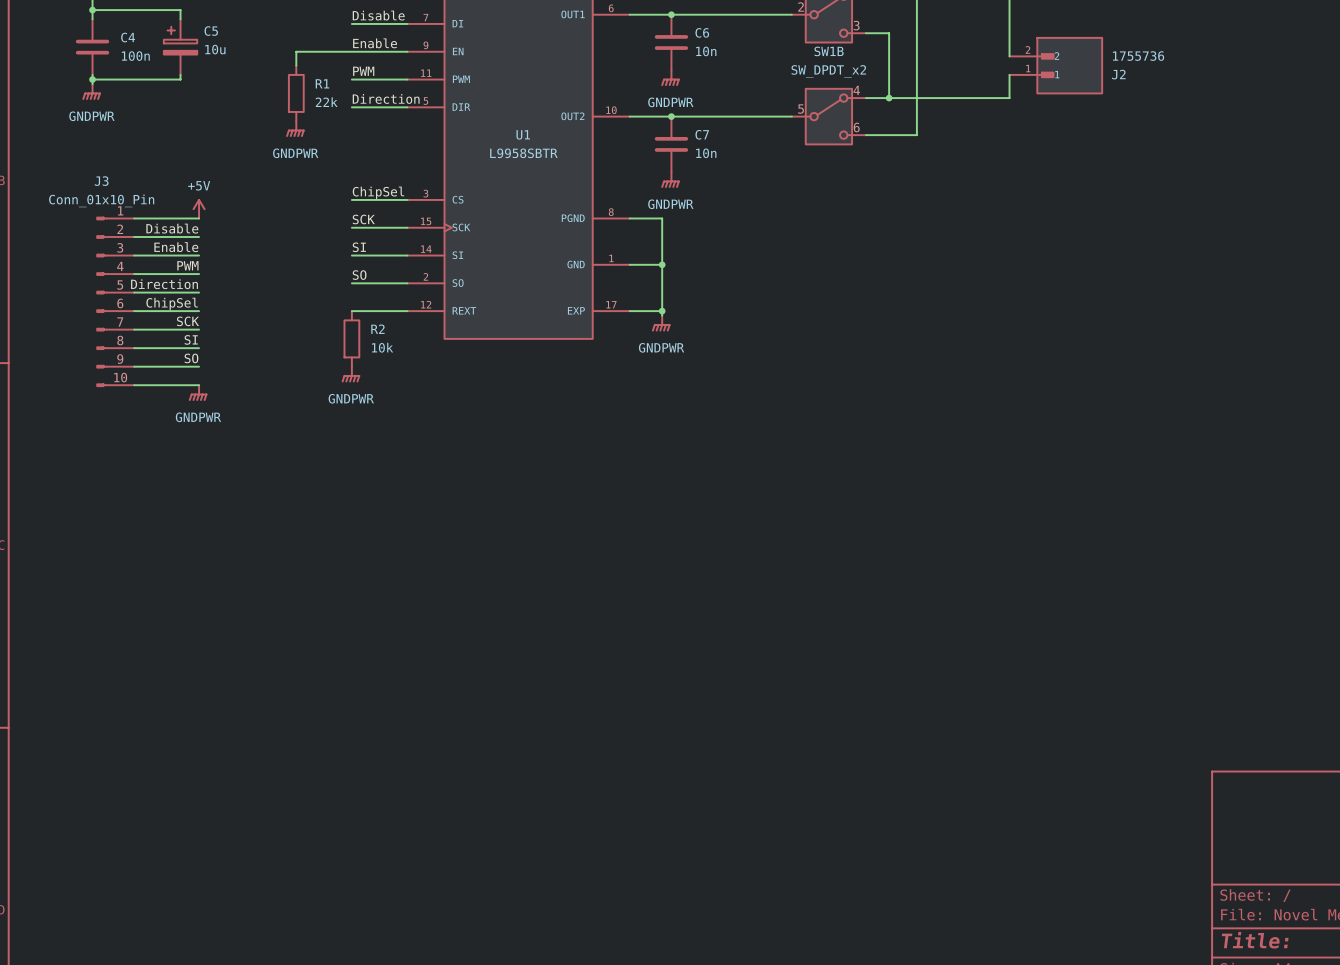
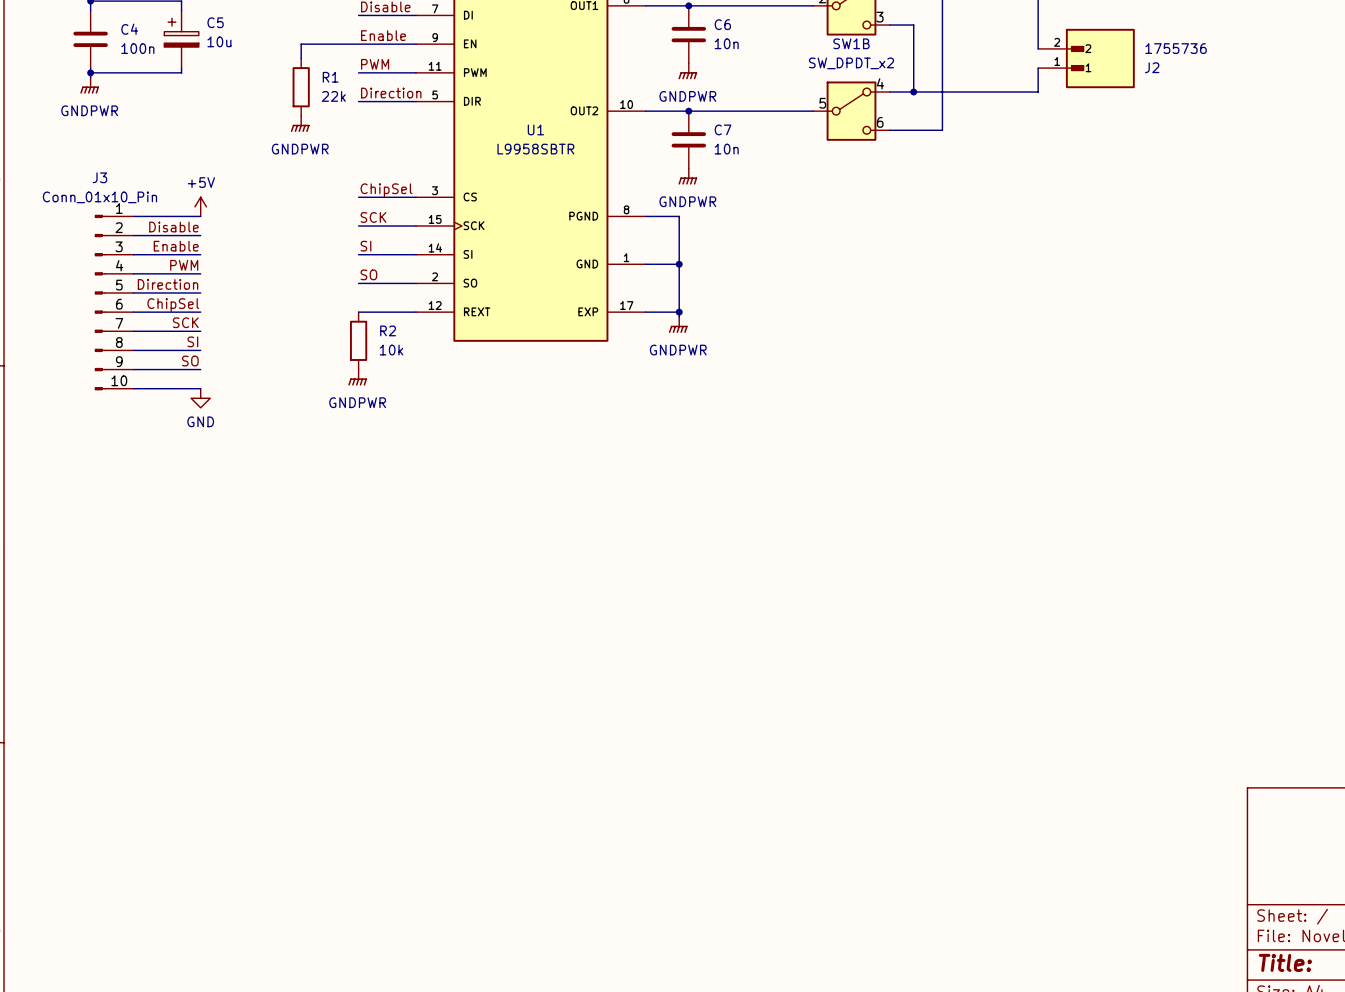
power symbol: GNDPWR (198, 392) -> GND (200, 398)

